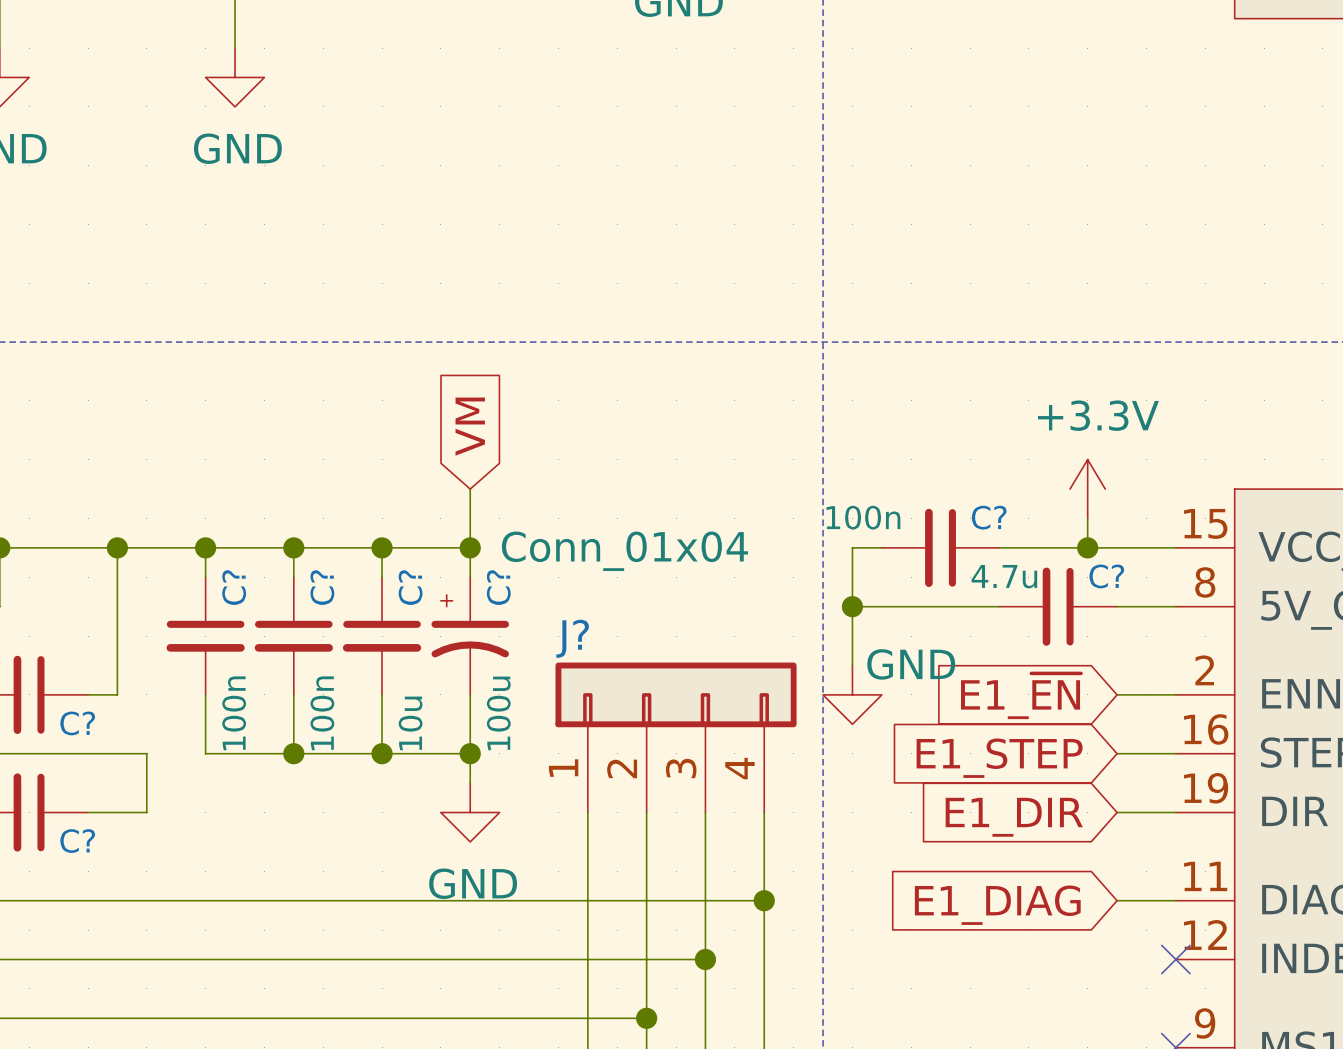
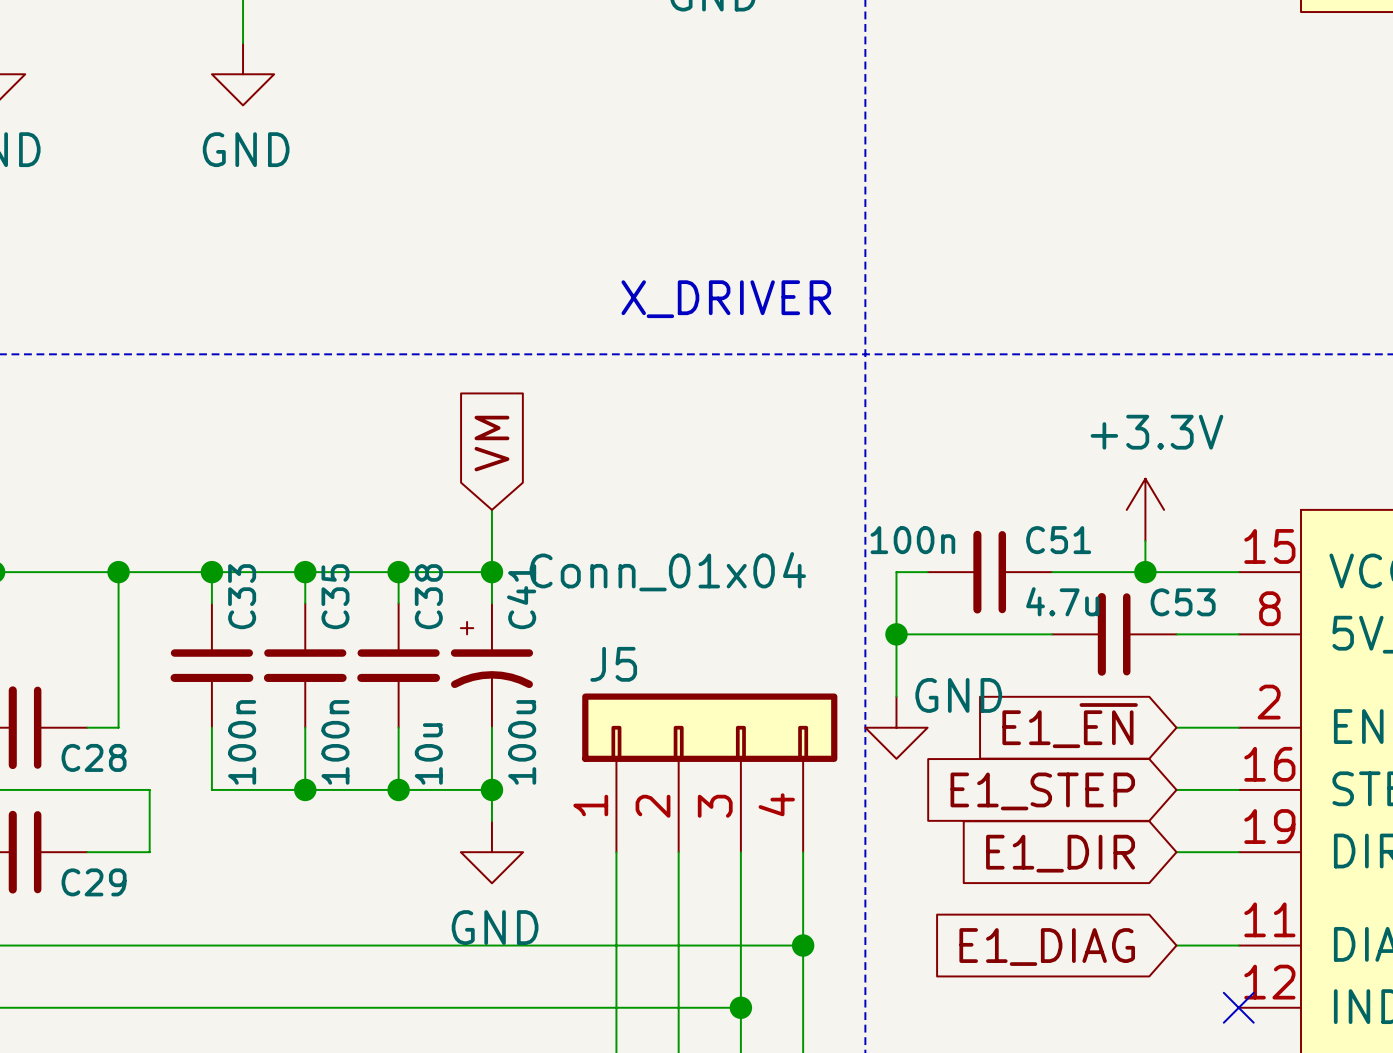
text: none -> X_DRIVER (726, 299)
C? name: C? (989, 517) -> C51 (1058, 540)
C? name: C? (1106, 576) -> C53 (1183, 602)
C? name: C? (234, 587) -> C33 (242, 596)
C? name: C? (322, 587) -> C35 (335, 596)
C? name: C? (410, 587) -> C38 (428, 596)
C? name: C? (498, 587) -> C41 (521, 596)
J? name: J? (572, 638) -> J5 (613, 664)
C? name: C? (77, 723) -> C28 (94, 757)
C? name: C? (77, 841) -> C29 (94, 882)

